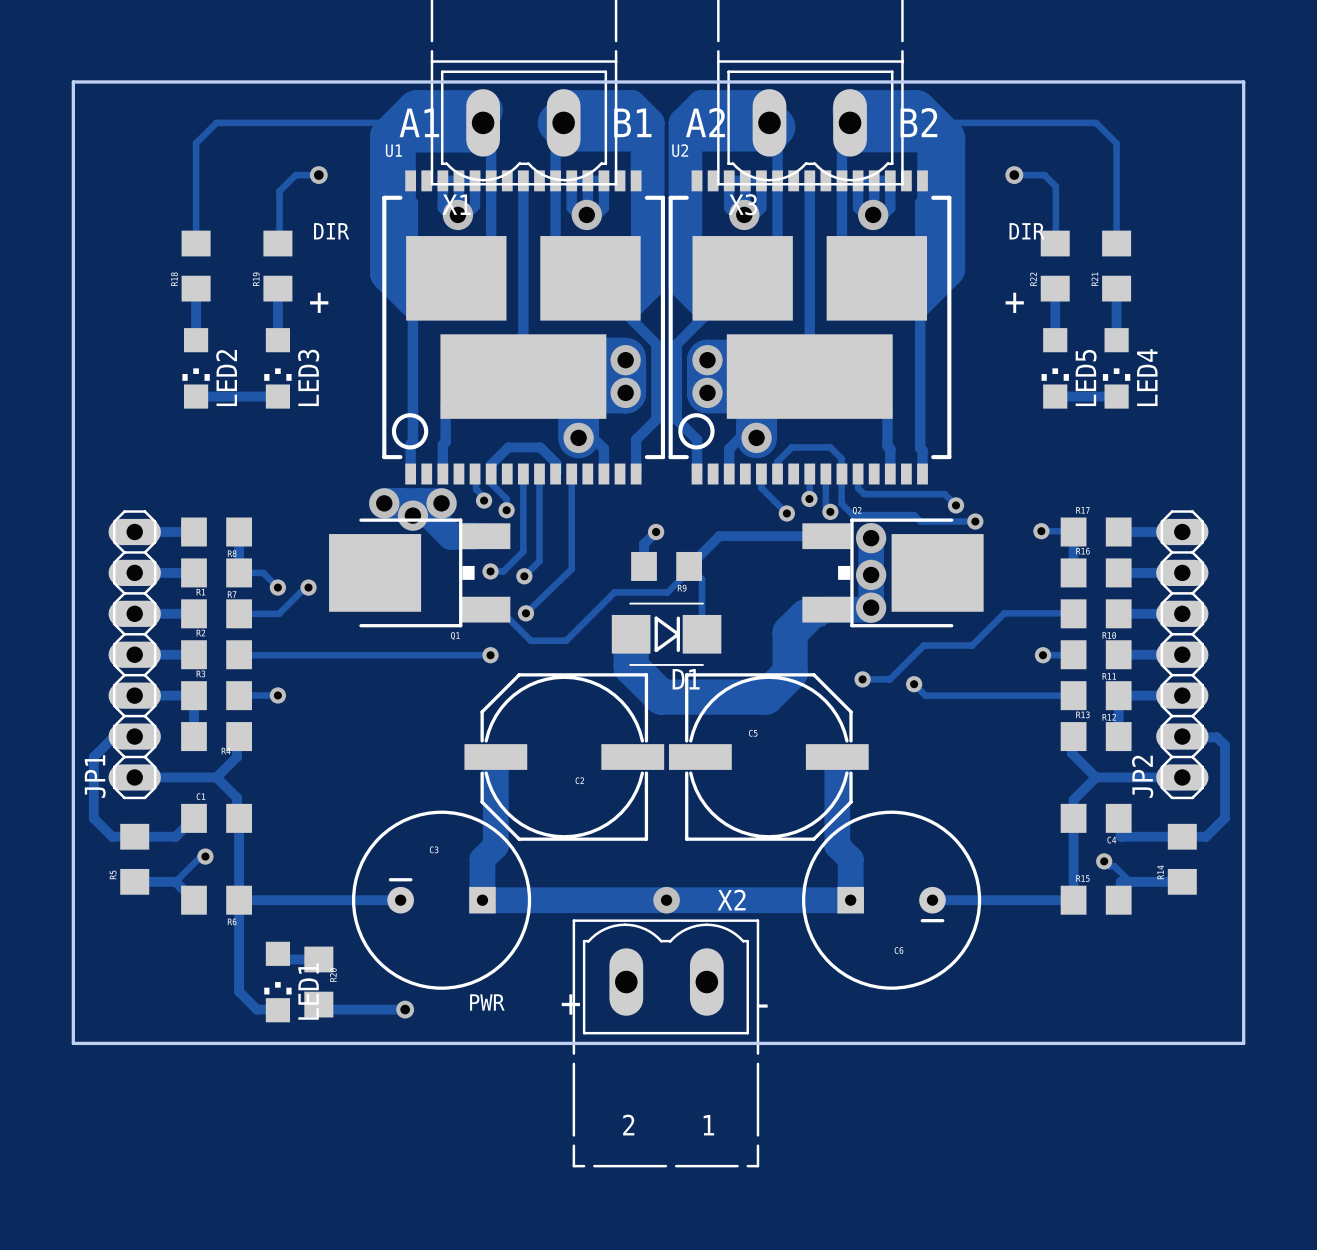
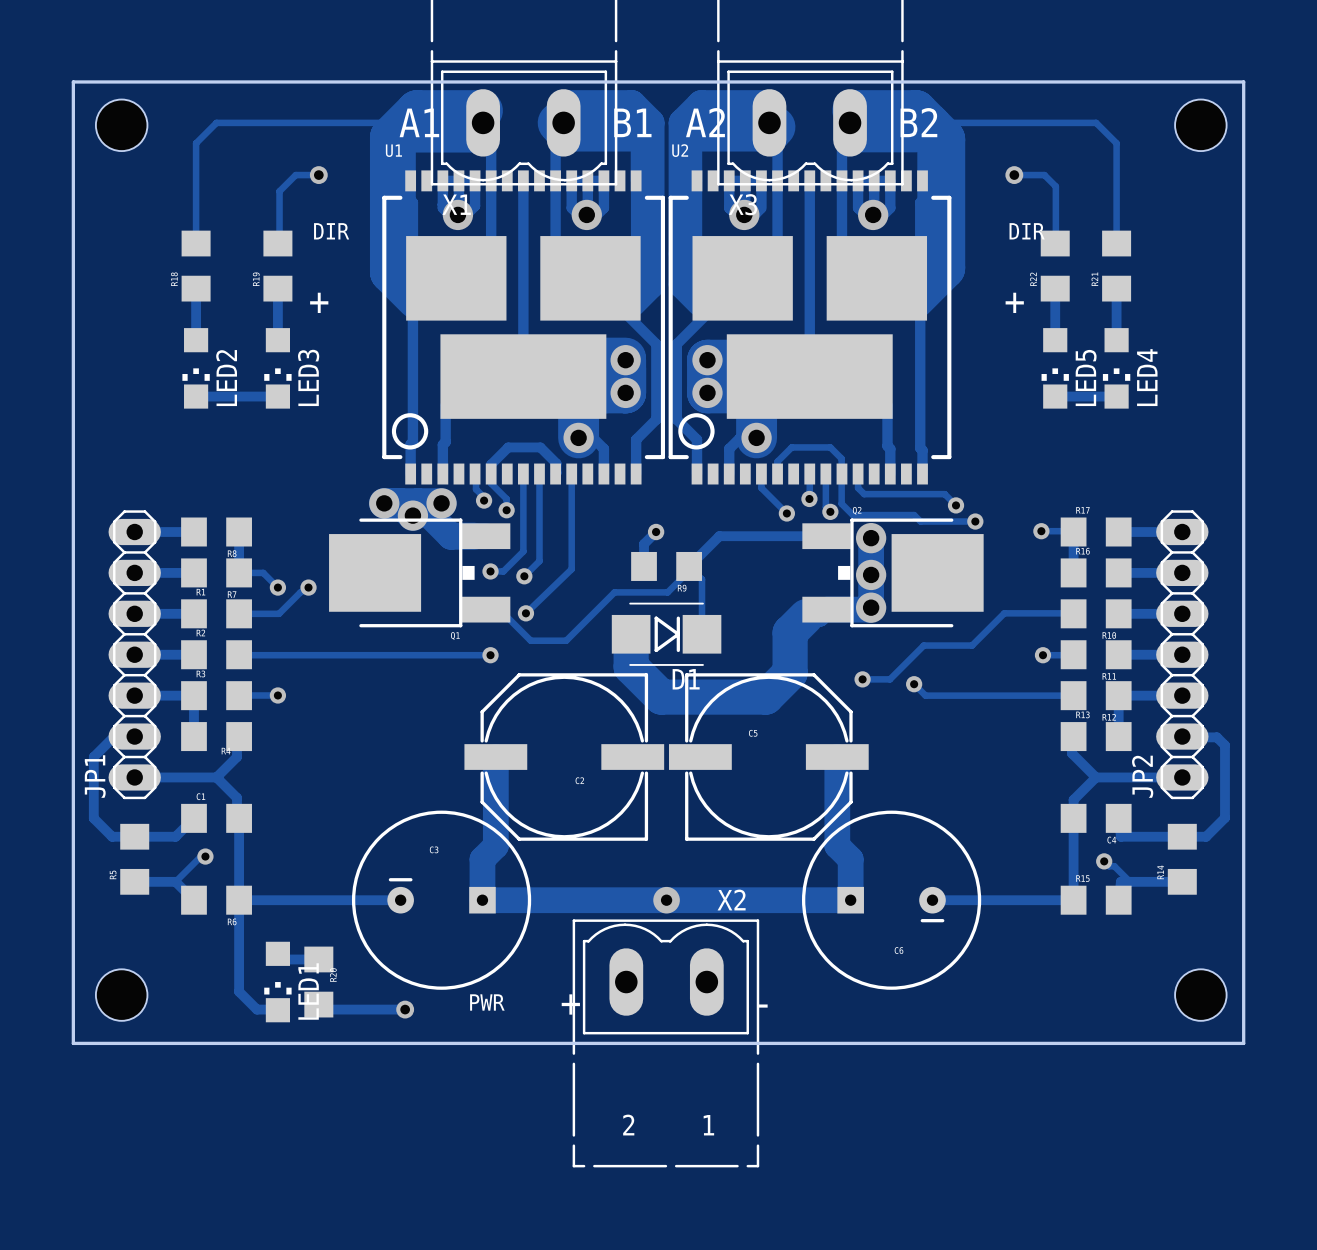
hole: none -> (121, 125)
hole: none -> (1200, 125)
hole: none -> (121, 995)
hole: none -> (1200, 995)

